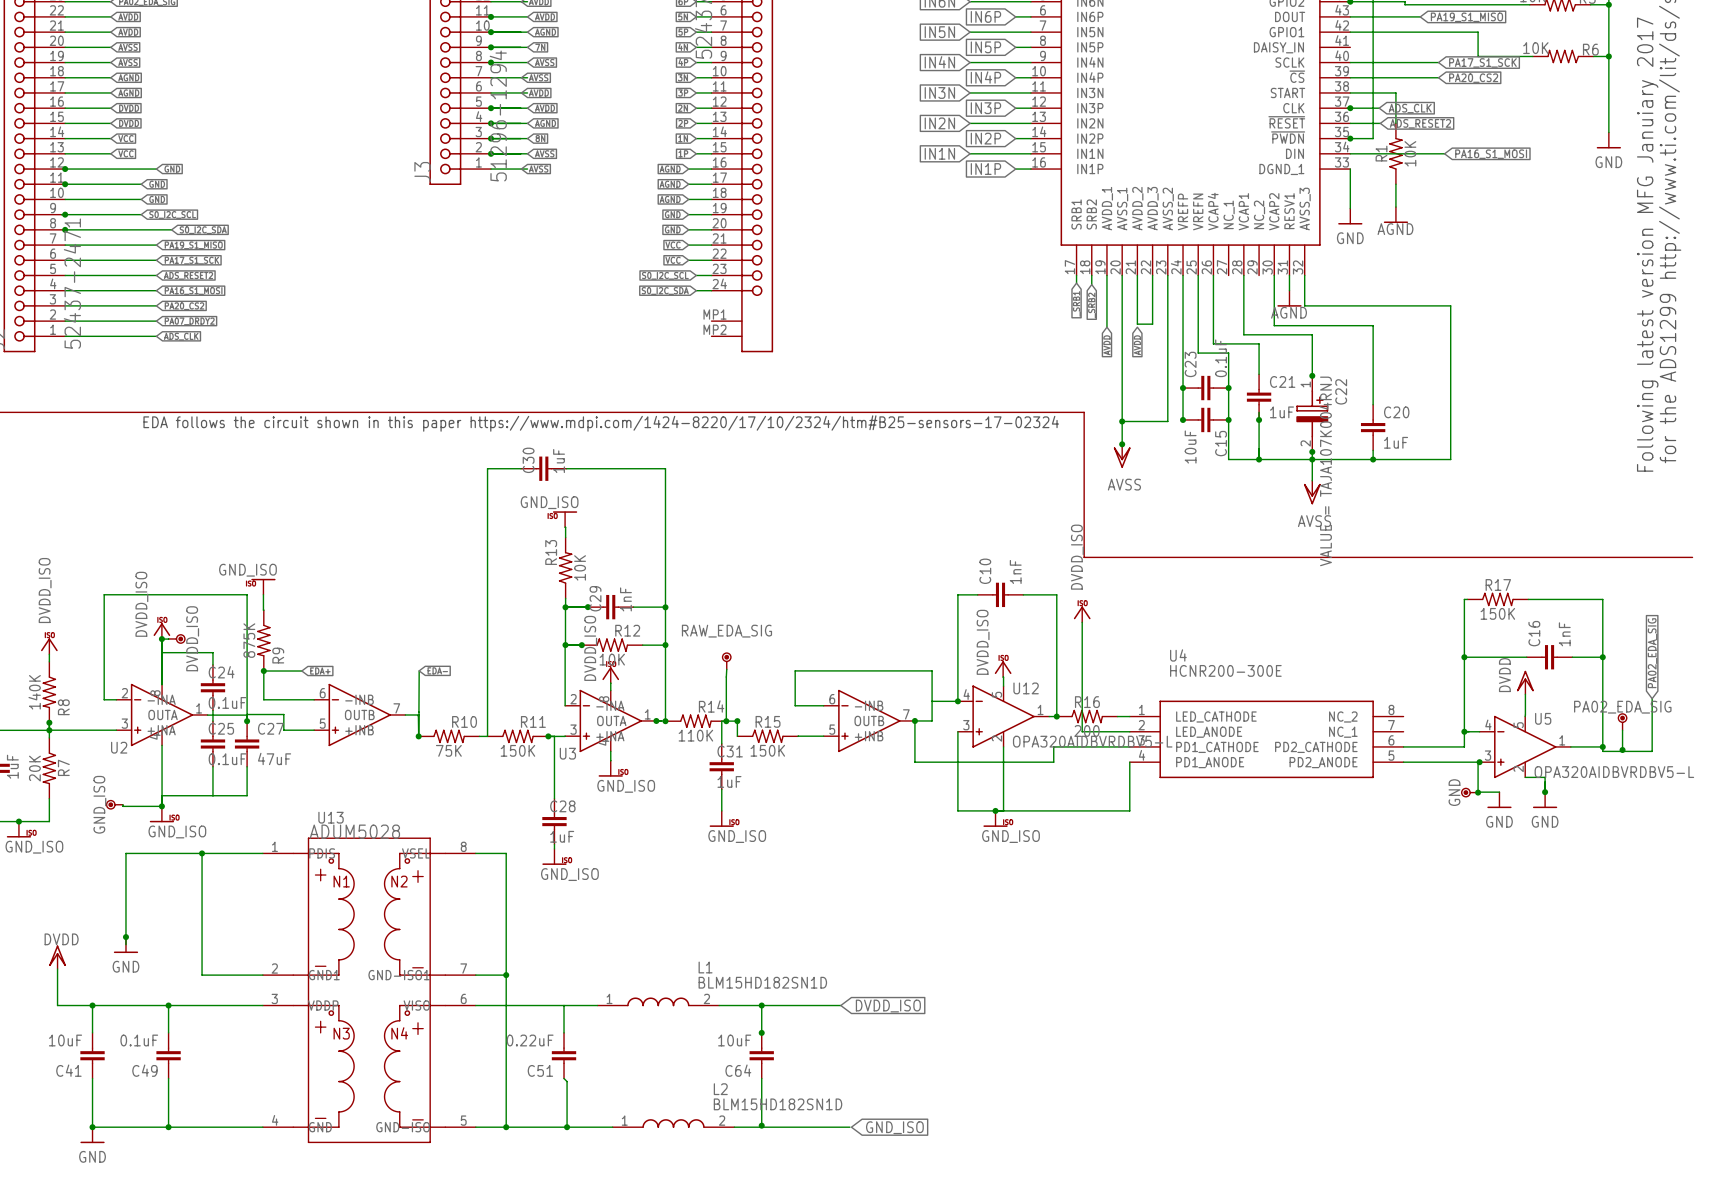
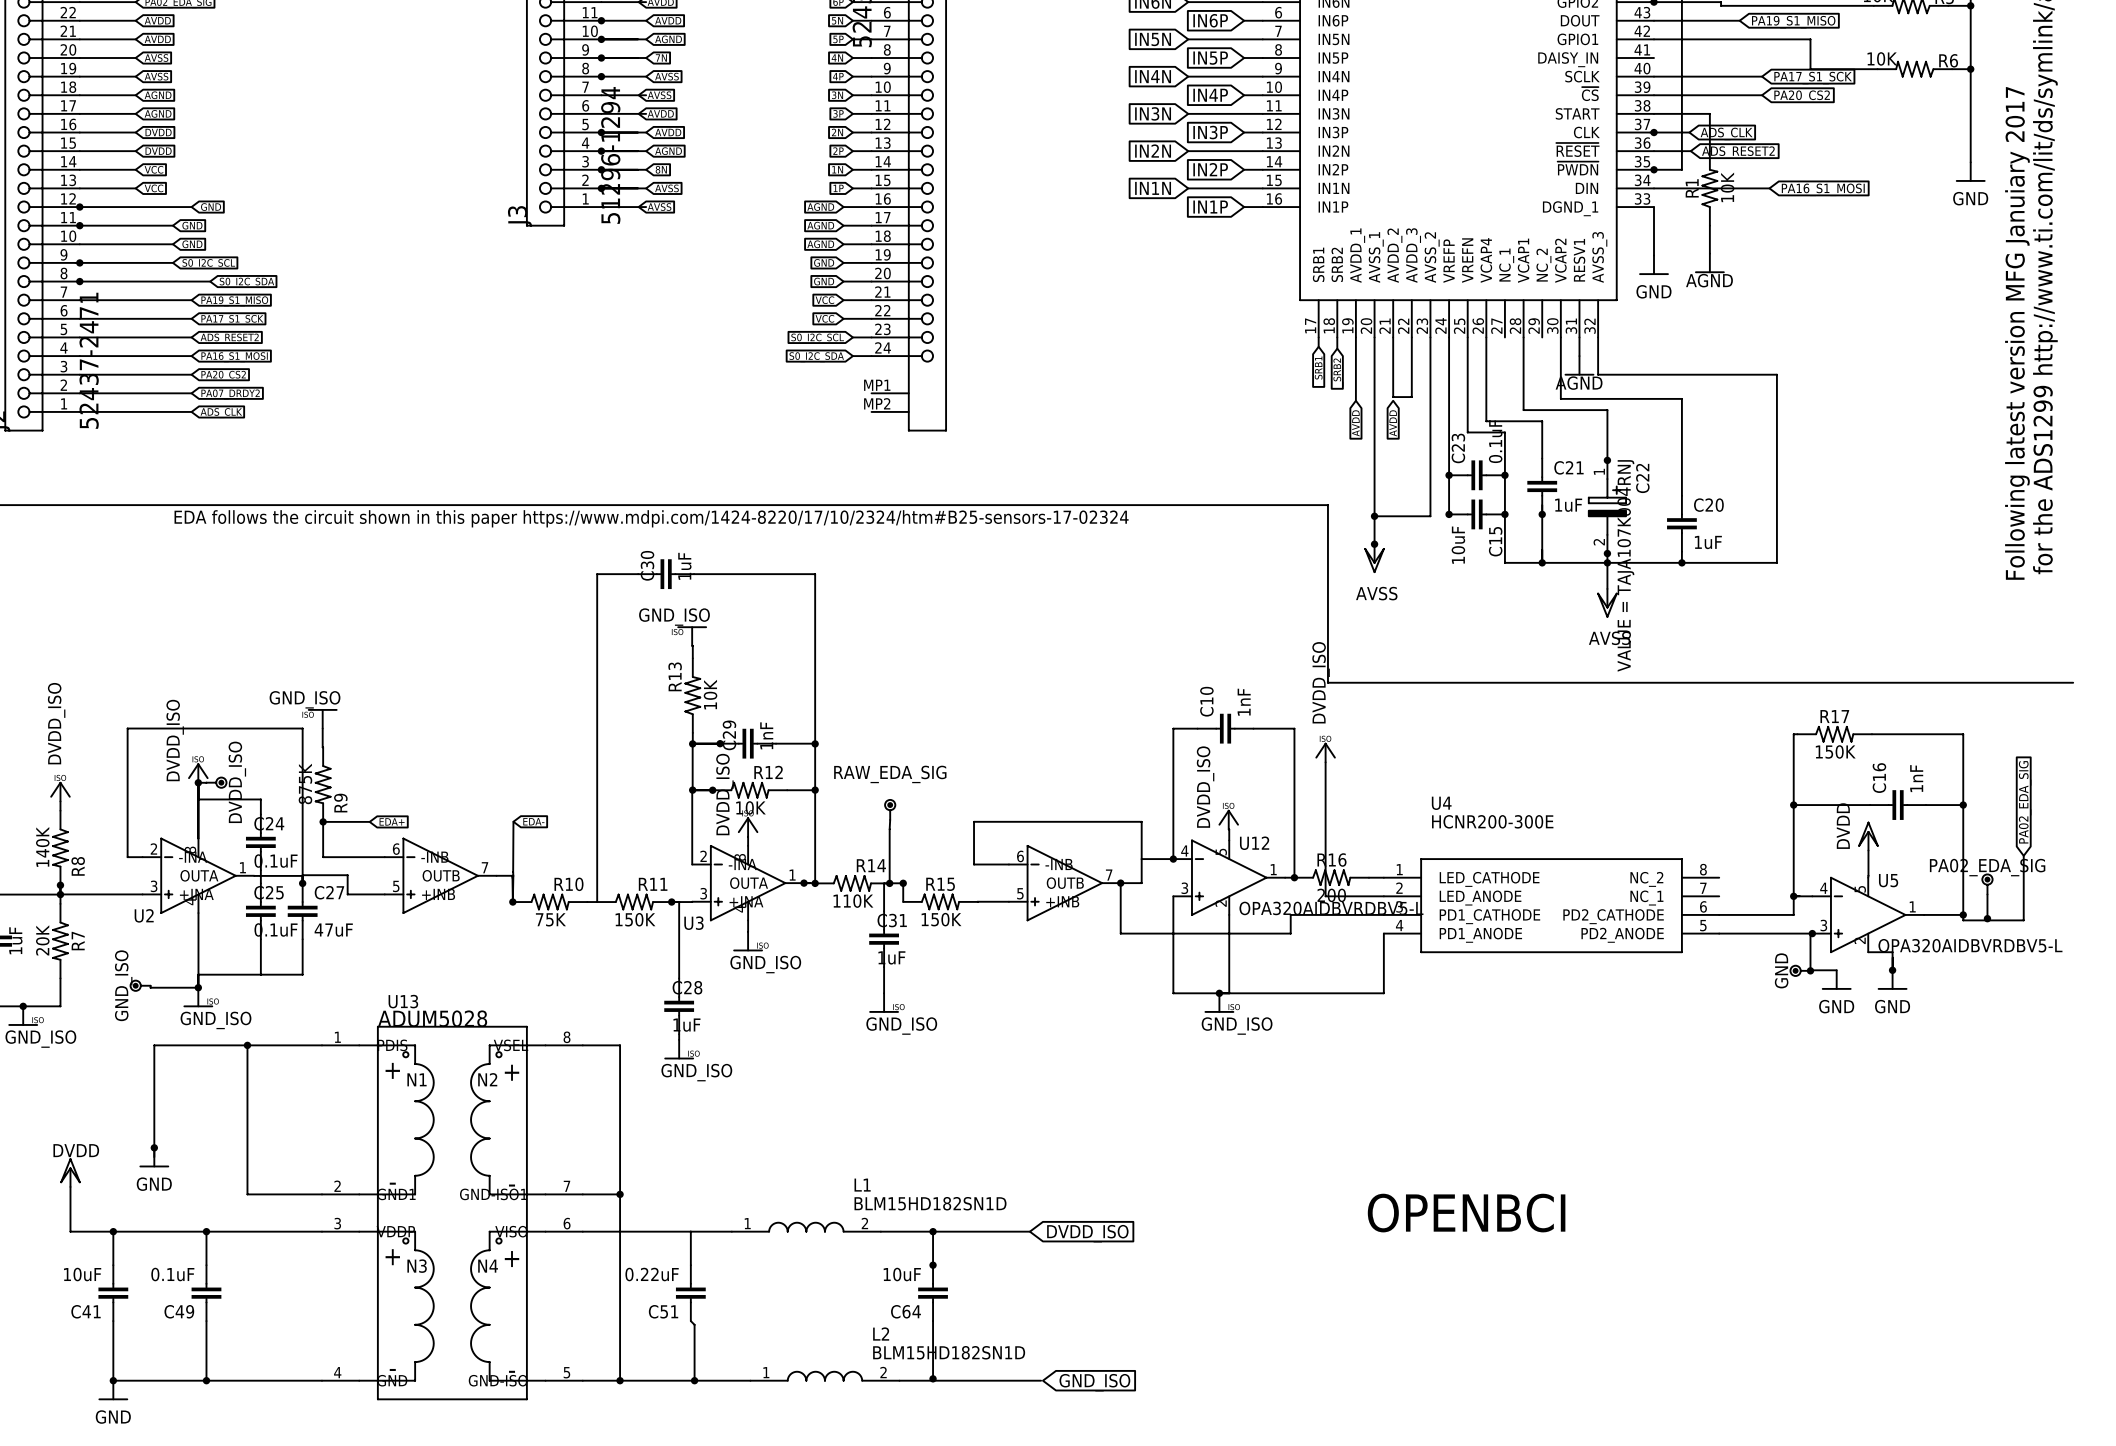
text: none -> OPENBCI (1466, 1213)

